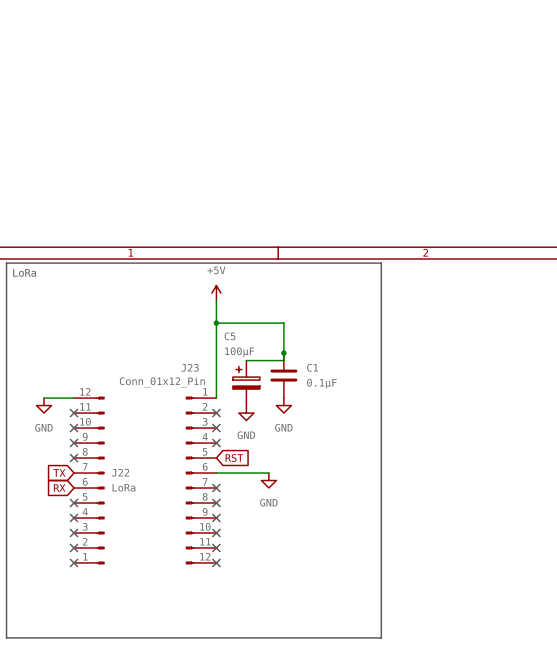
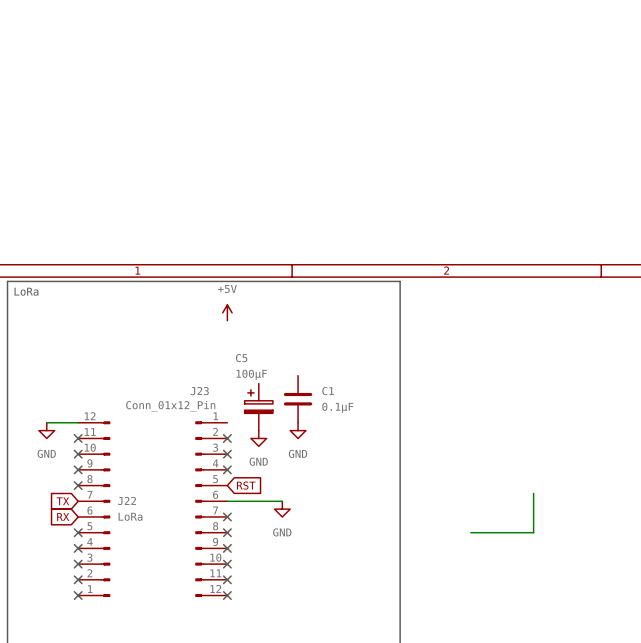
wire: (216, 300) (216, 398) -> none
wire: (216, 323) (283, 323) (283, 360) (246, 360) -> none
junction: (216, 323) -> none
junction: (283, 353) -> none
wire: none -> (533, 493) (533, 532) (470, 532)

